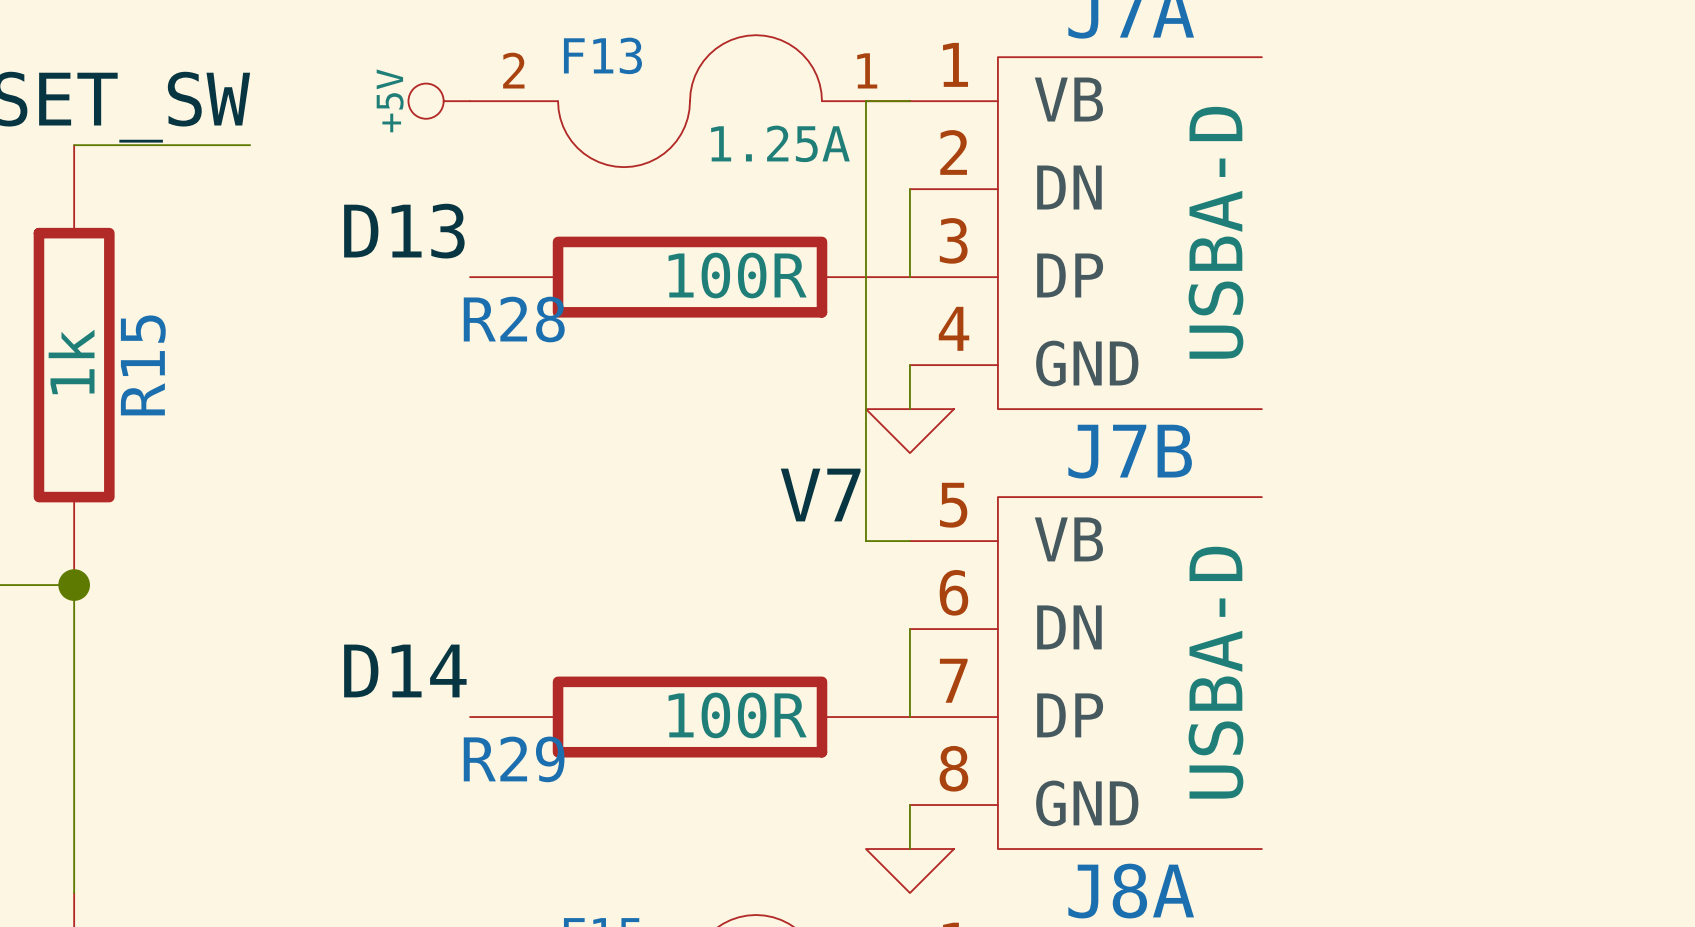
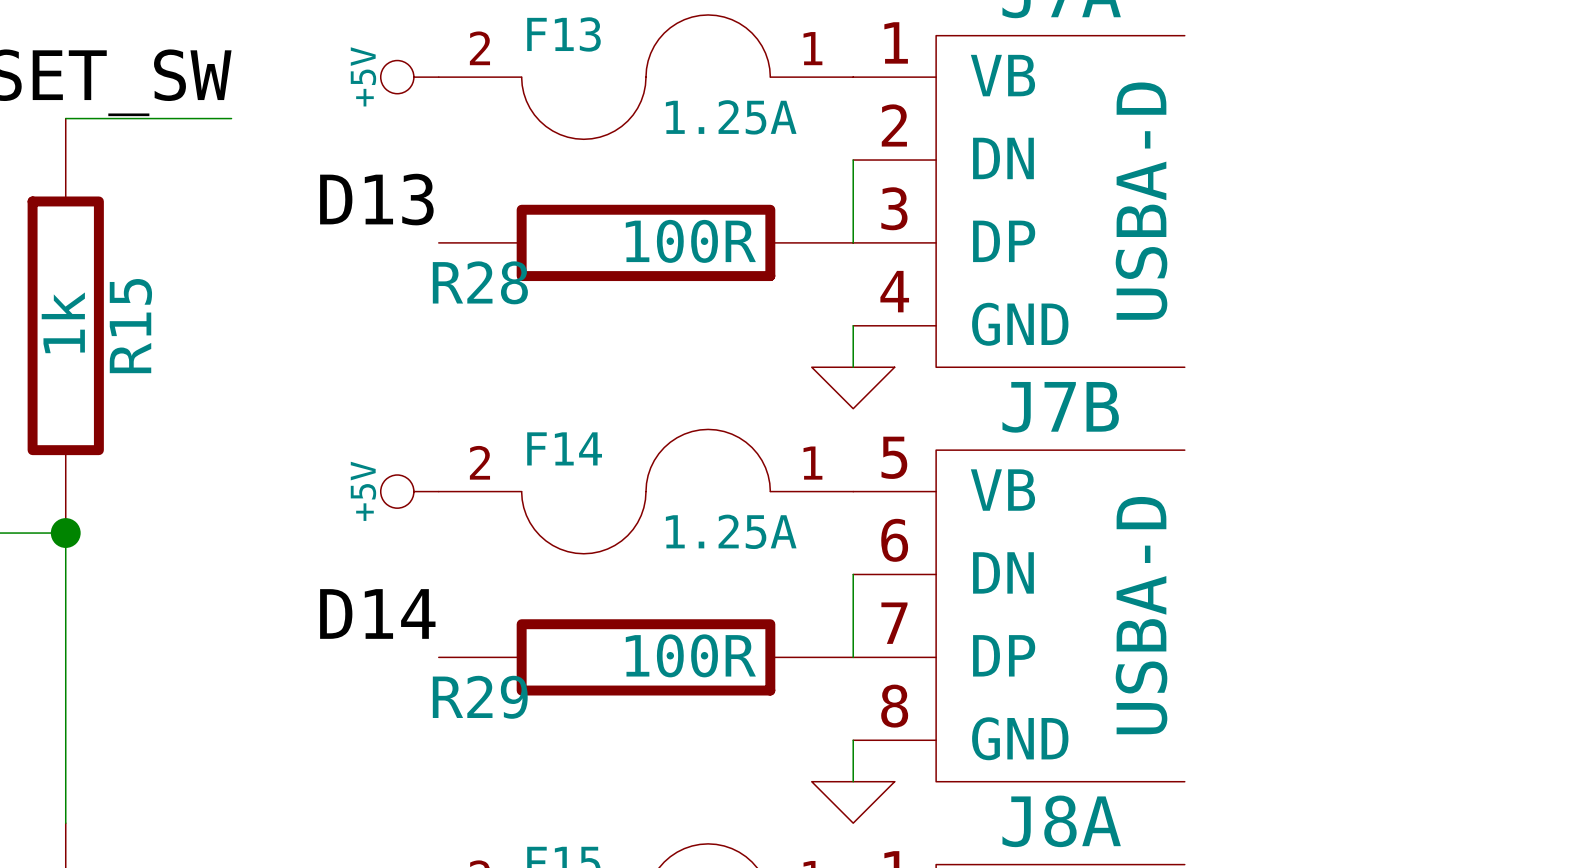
wire: (909, 101) (865, 101) (865, 541) (909, 541) -> none
label: V7 (820, 495) -> none
power symbol: none -> +5V (409, 491)
F14: none -> 1.25A (645, 491)

